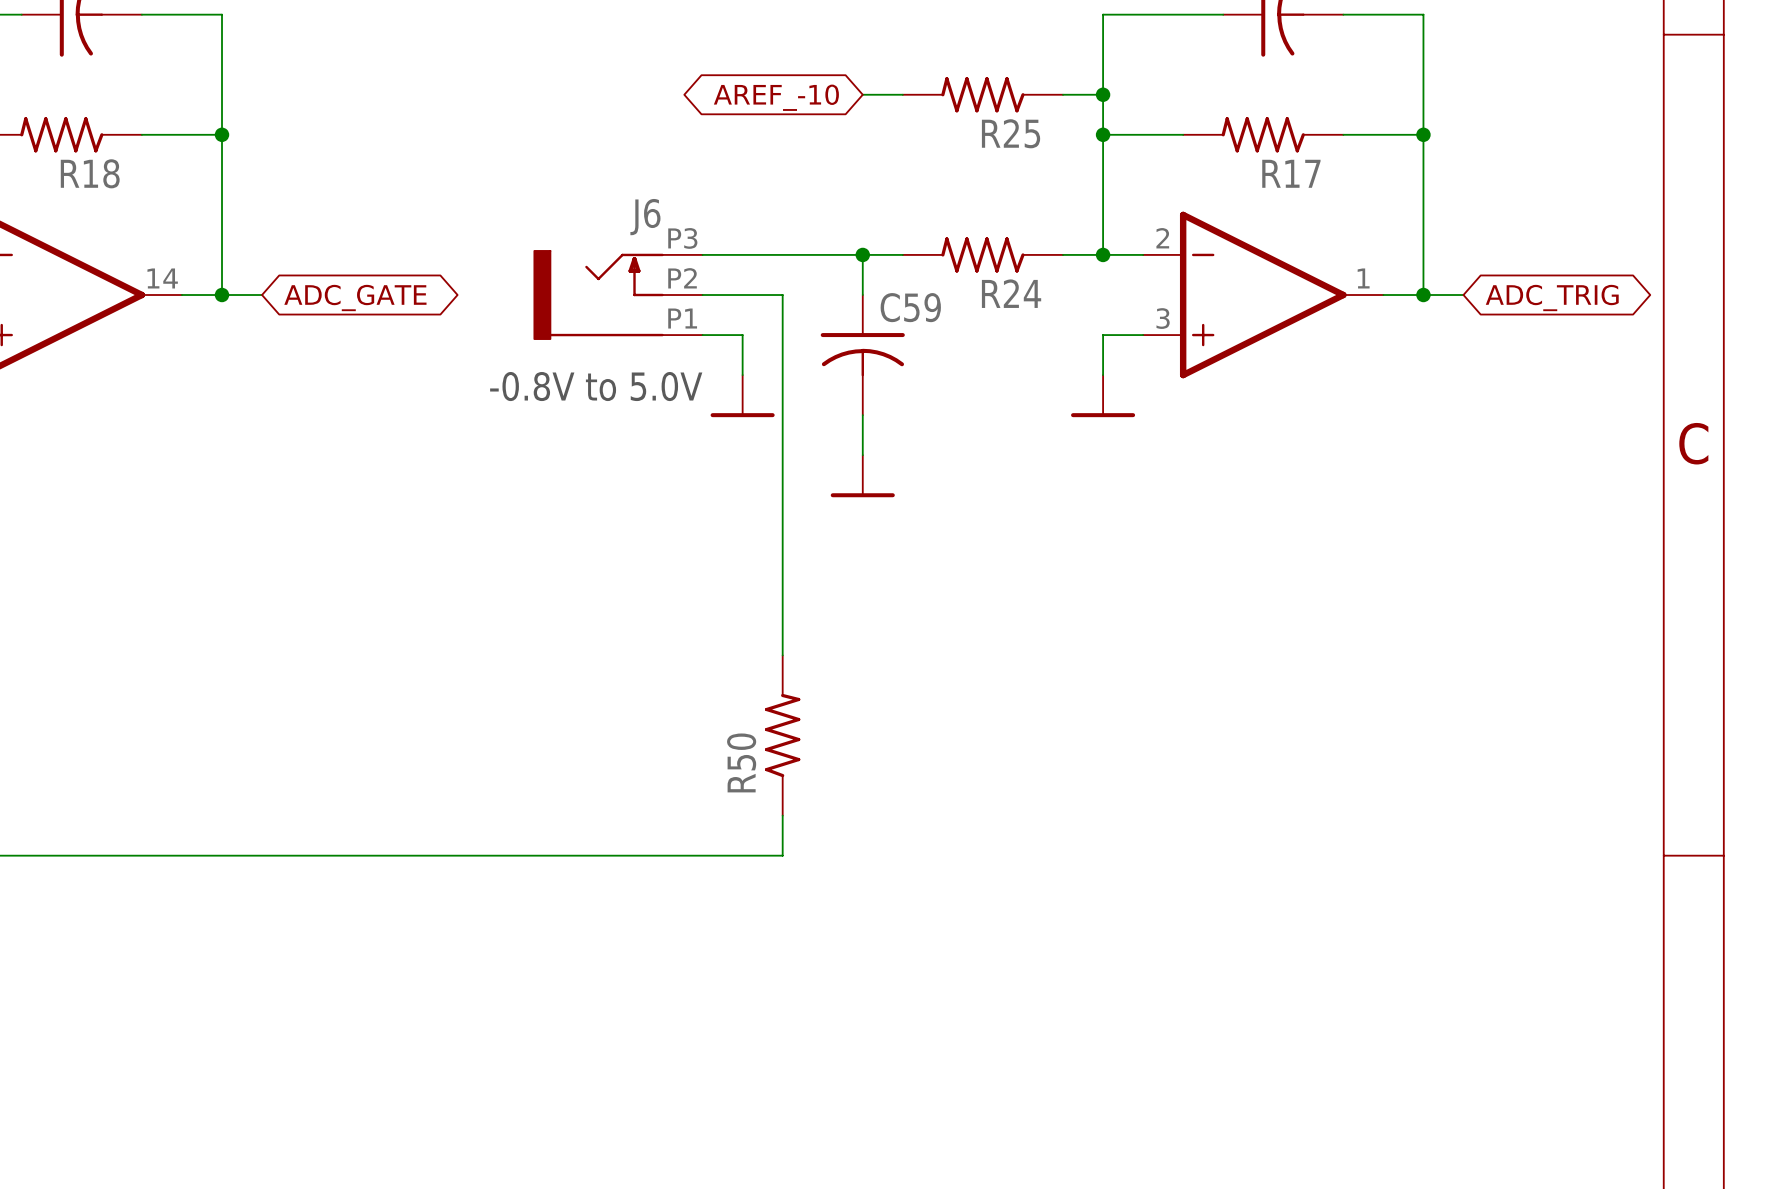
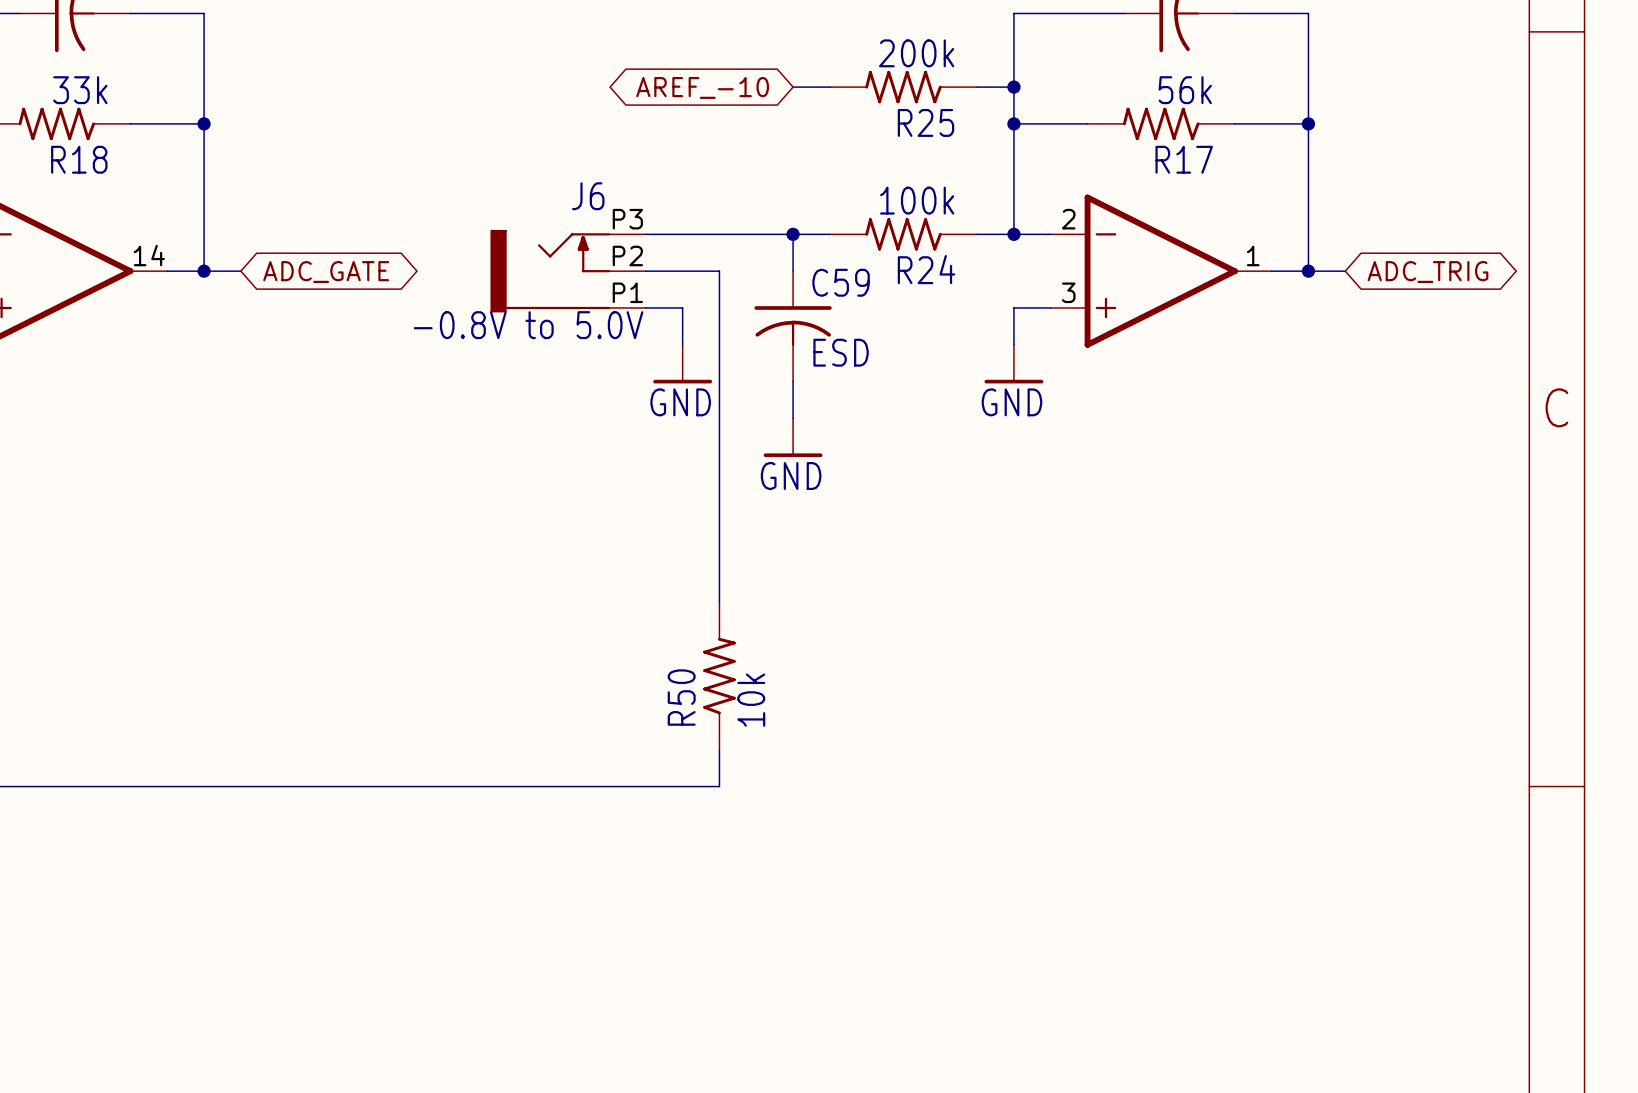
R25 value: none -> 200k (916, 53)
R18 value: none -> 33k (80, 90)
R17 value: none -> 56k (1185, 90)
R24 value: none -> 100k (917, 200)
C59 value: none -> ESD (841, 352)
text position: -0.8V to 5.0V (596, 386) -> -0.8V to 5.0V (528, 325)
power symbol text: none -> GND (680, 402)
power symbol text: none -> GND (1011, 402)
power symbol text: none -> GND (791, 476)
R50 value: none -> 10k (751, 700)

